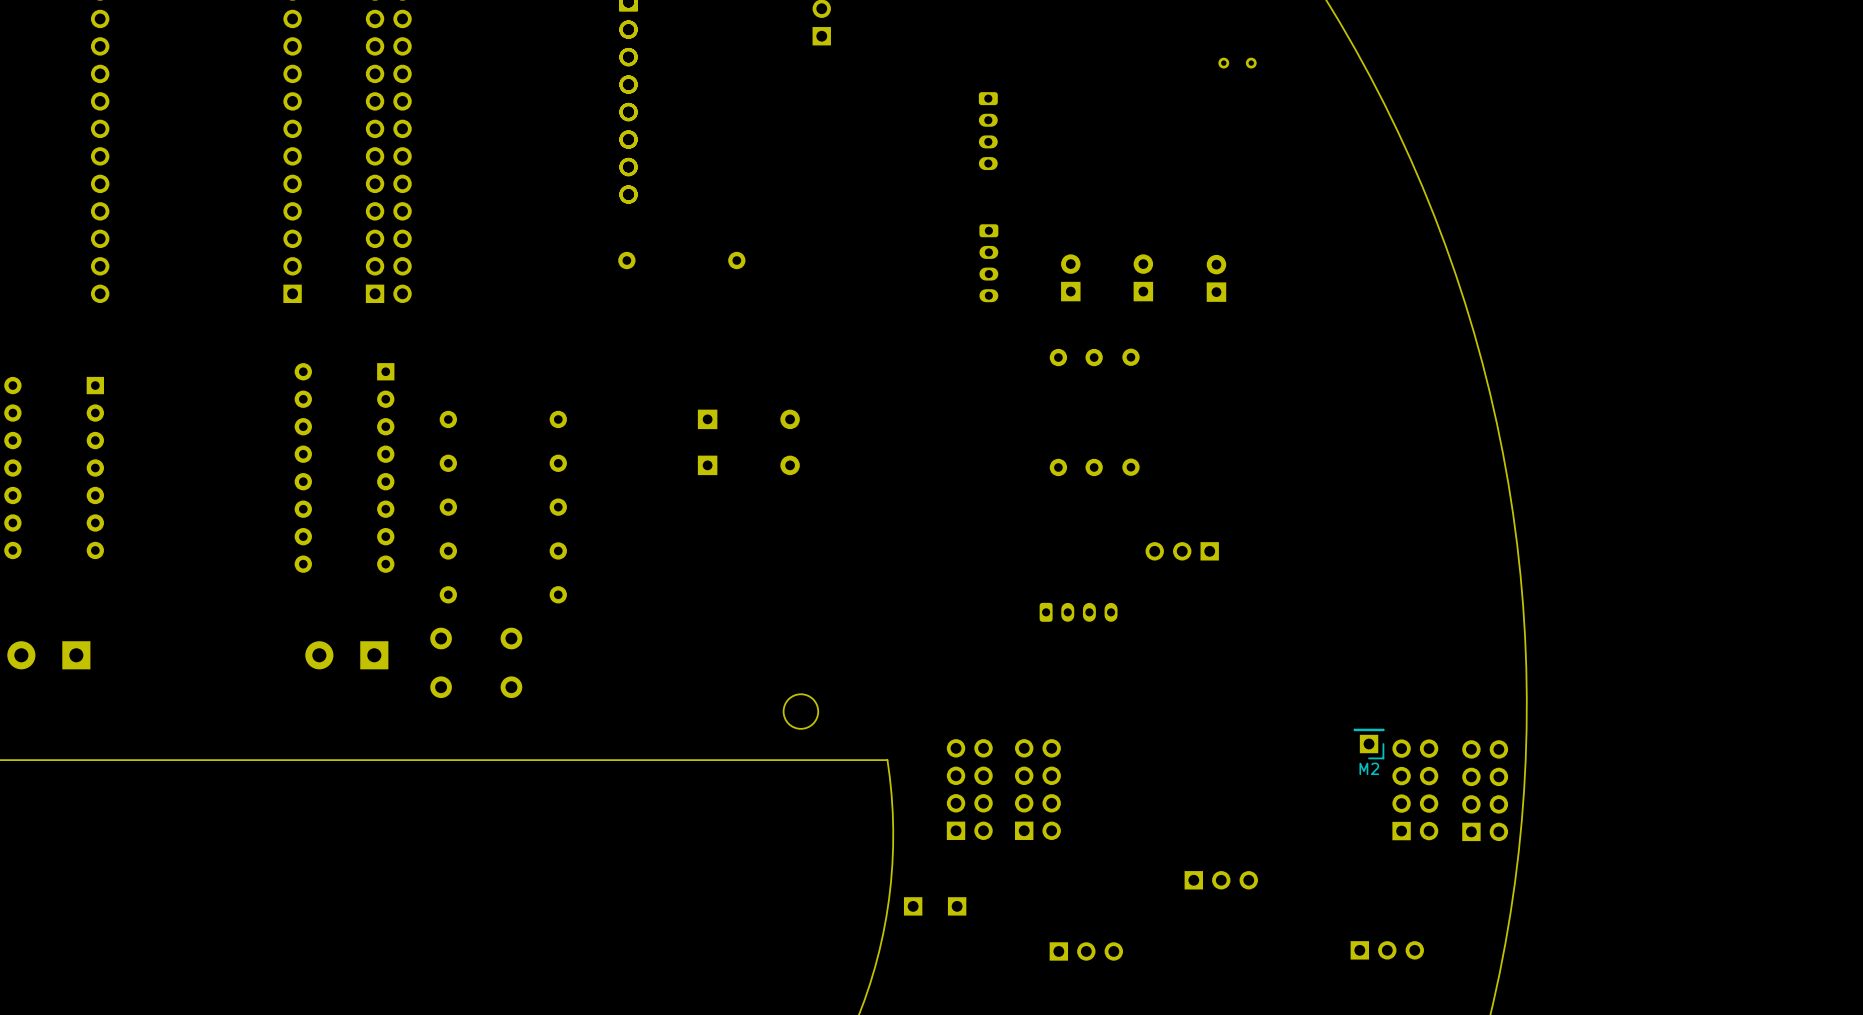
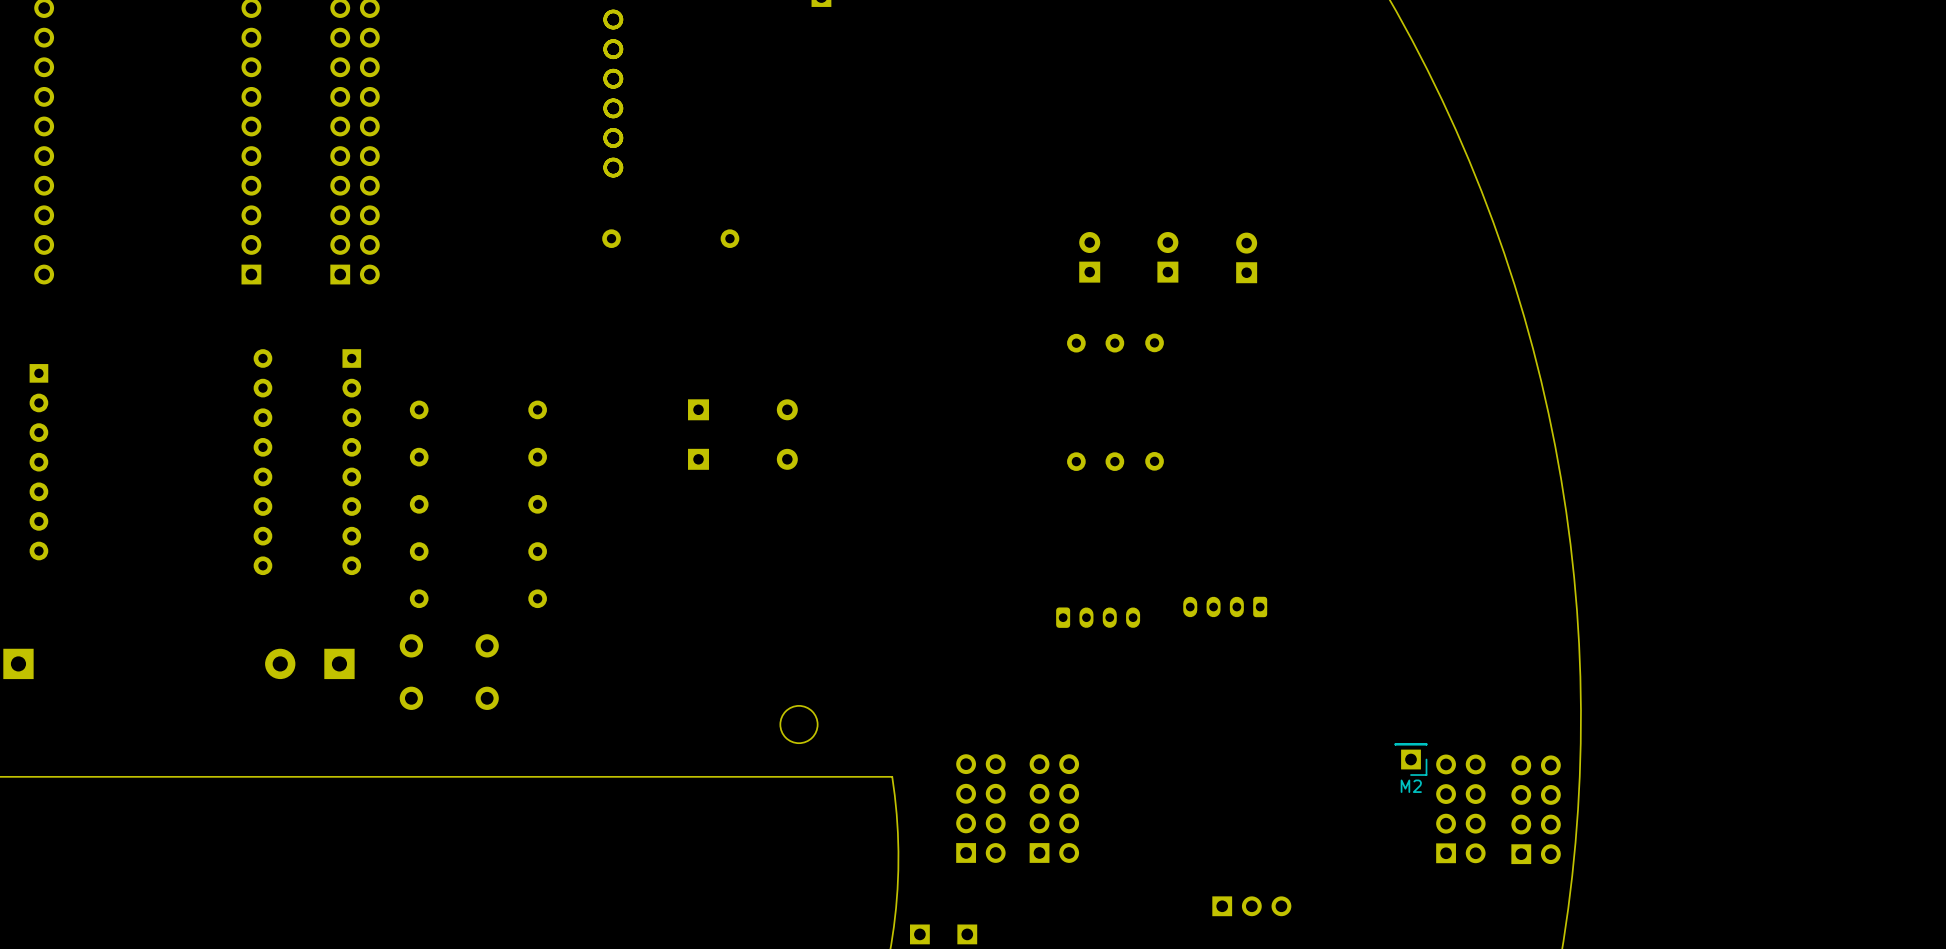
part: (1237, 63) -> none
part: (988, 131) -> none
part: (988, 263) -> none
part: (1182, 551) -> none
part: none -> (1225, 606)

